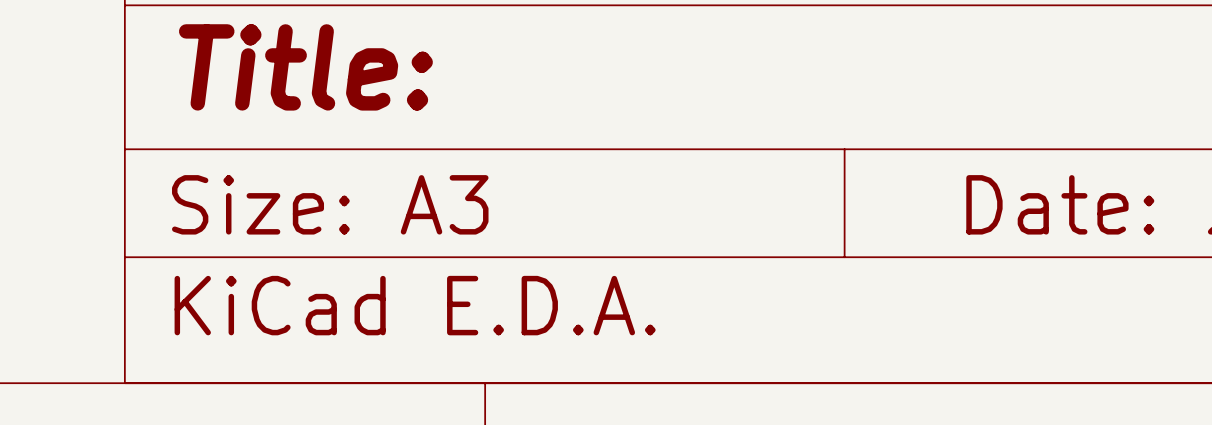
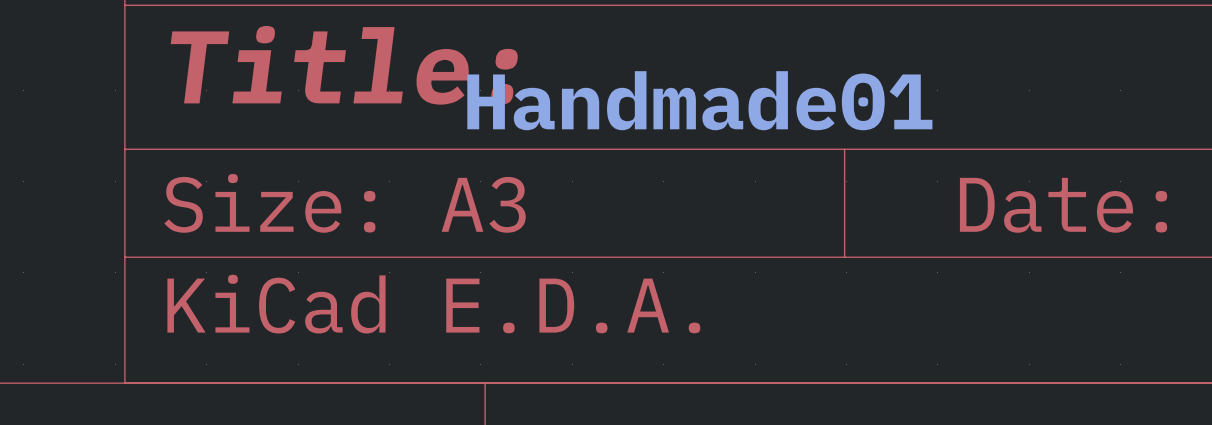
text: none -> Handmade01 (699, 100)

